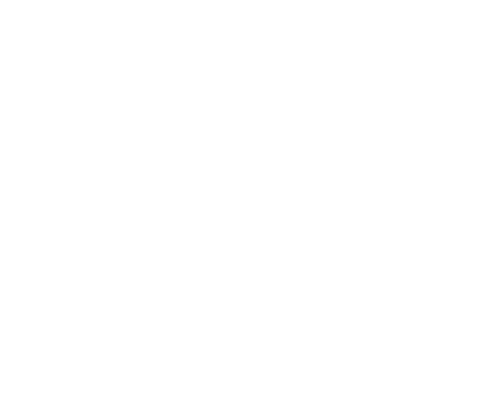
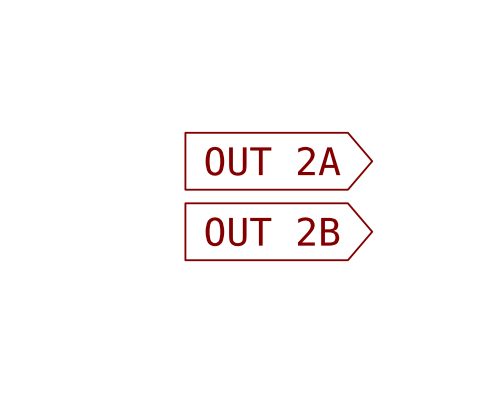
global label: none -> OUT 2A (272, 161)
global label: none -> OUT 2B (272, 231)

